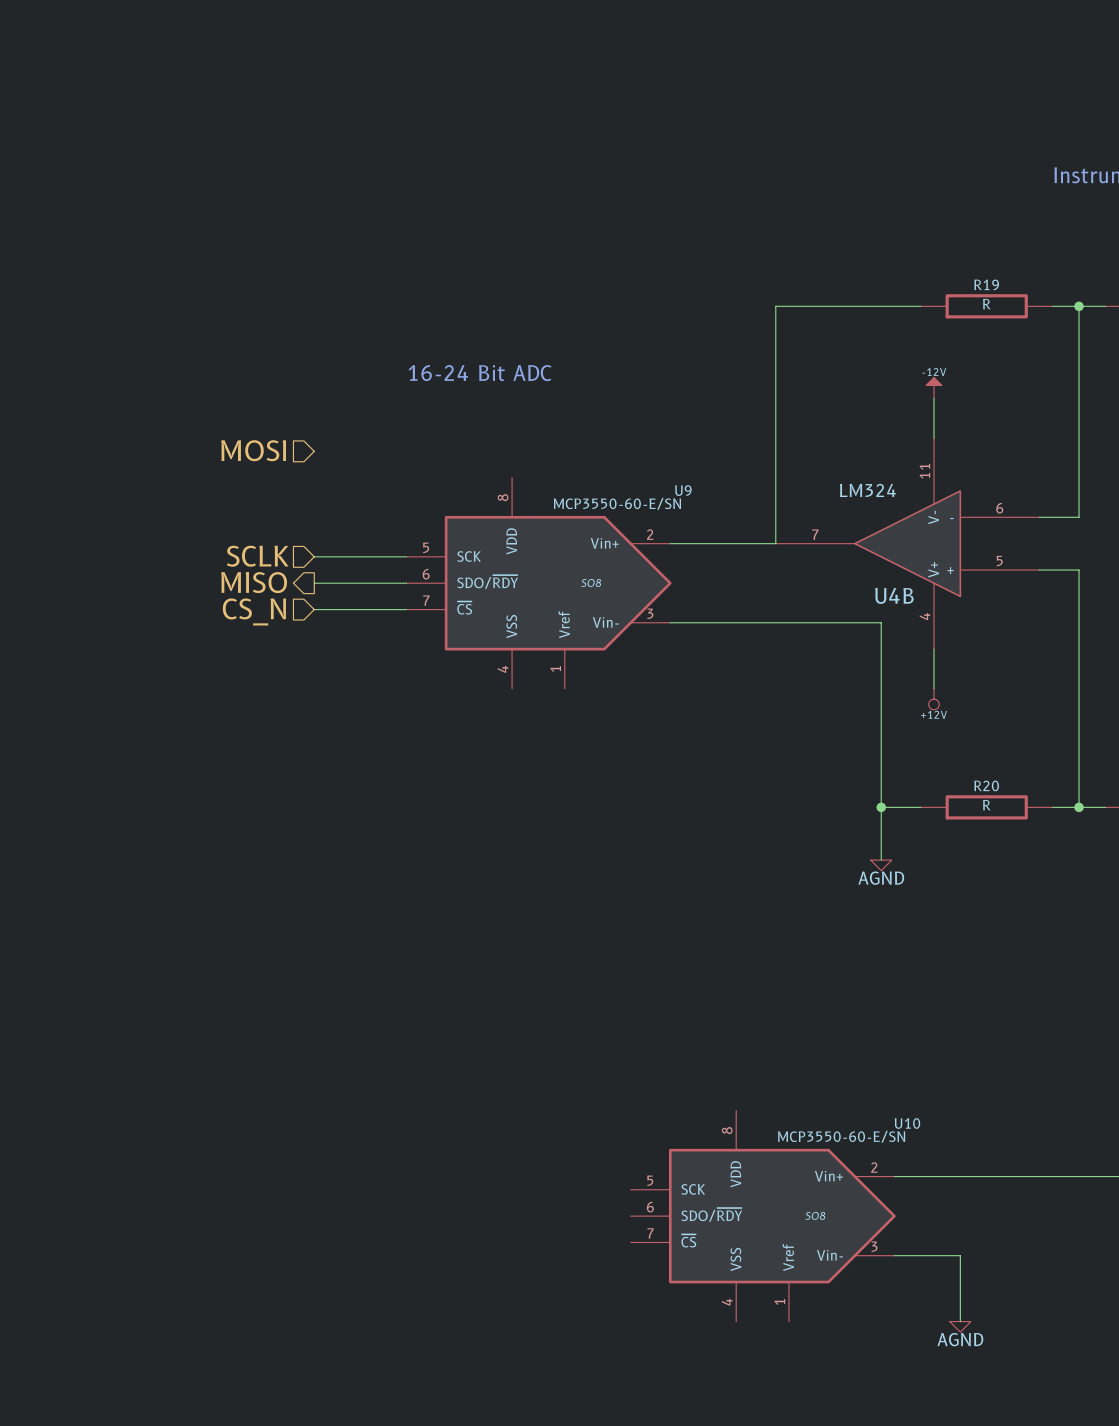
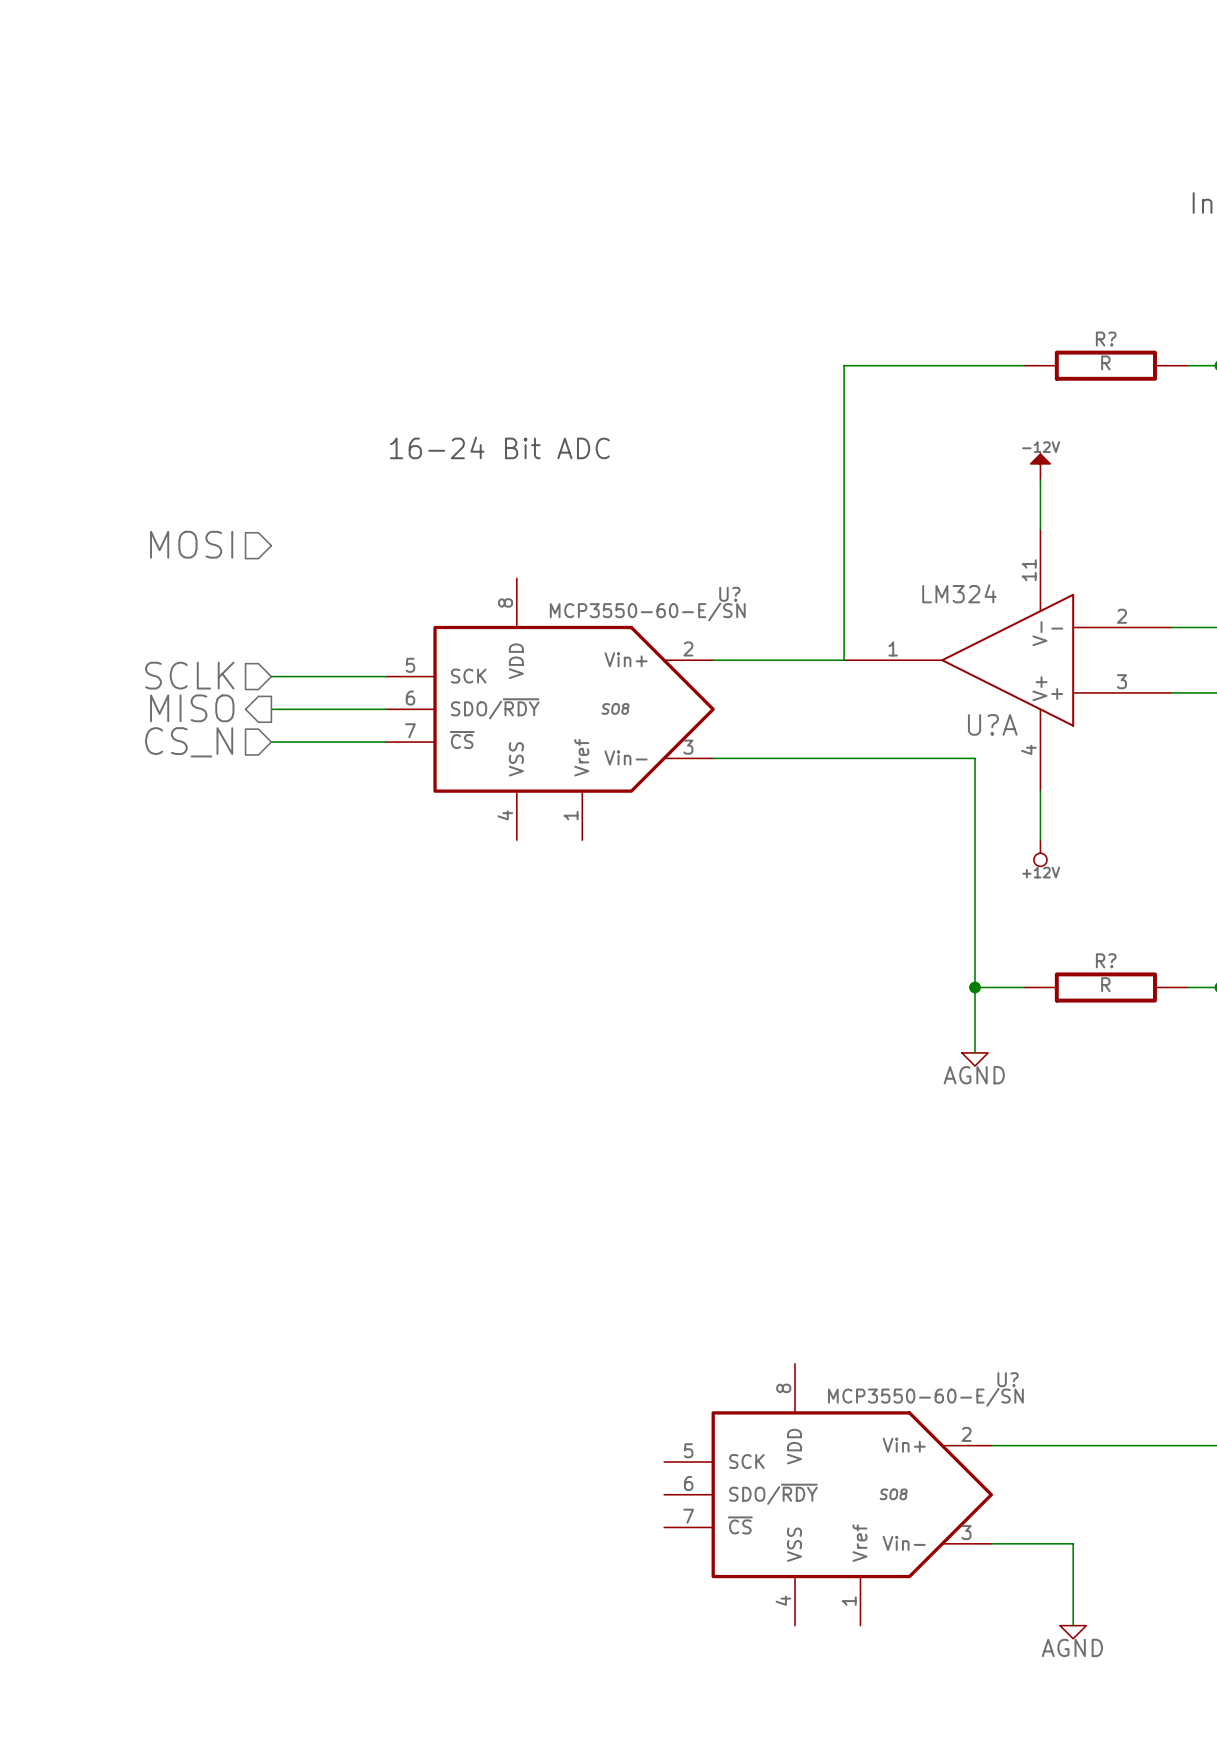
R19 name: R19 (986, 284) -> R? (1106, 339)
U9 name: U9 (683, 490) -> U? (729, 594)
U4B pin number: 6 (999, 508) -> 2 (1121, 616)
U4B pin number: 7 (815, 534) -> 1 (893, 648)
U4B pin number: 5 (999, 561) -> 3 (1121, 681)
U4B name: U4B (894, 595) -> U?A (992, 724)
R20 name: R20 (986, 785) -> R? (1106, 960)
U10 name: U10 (907, 1123) -> U? (1008, 1379)

